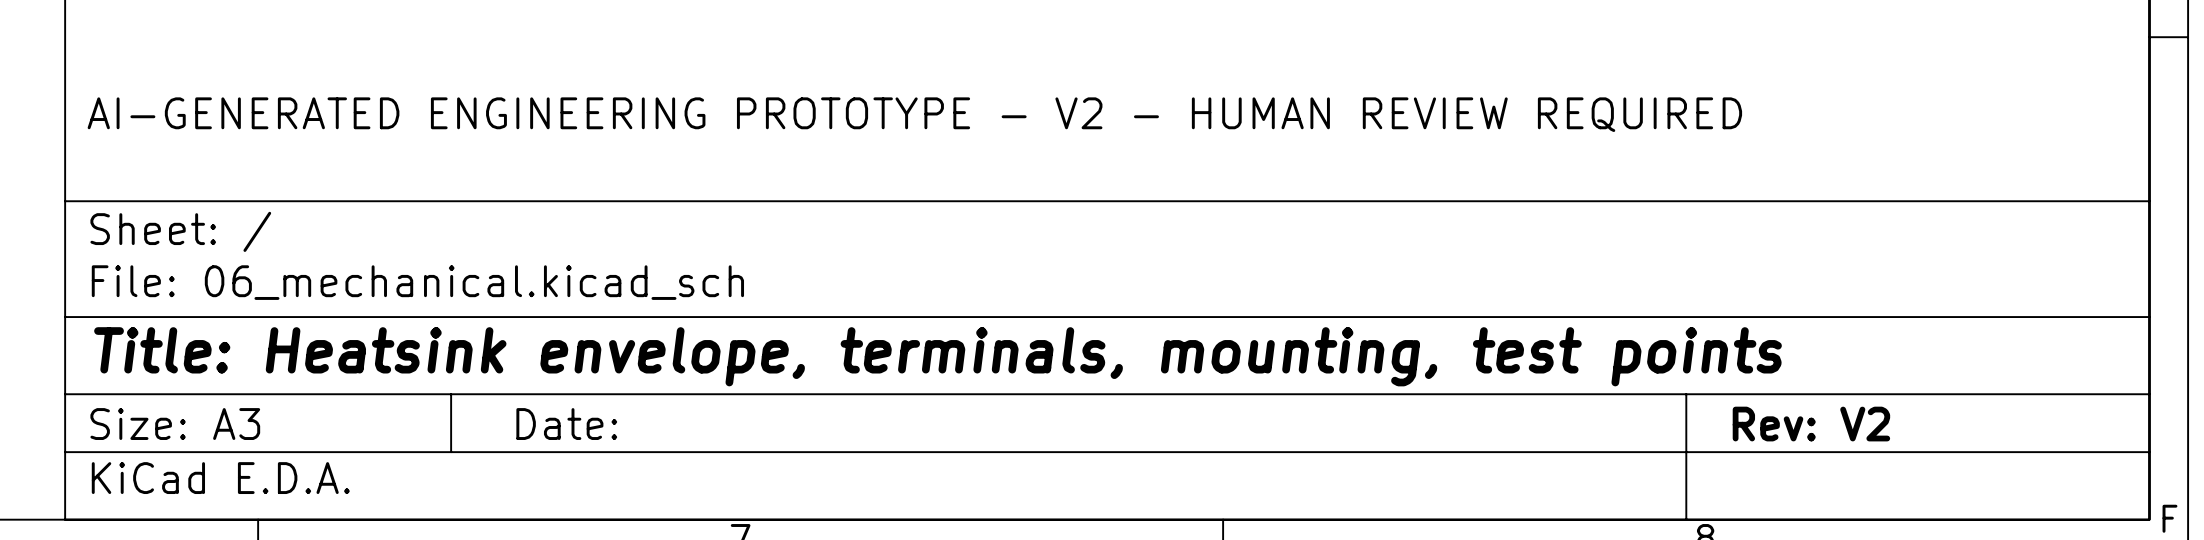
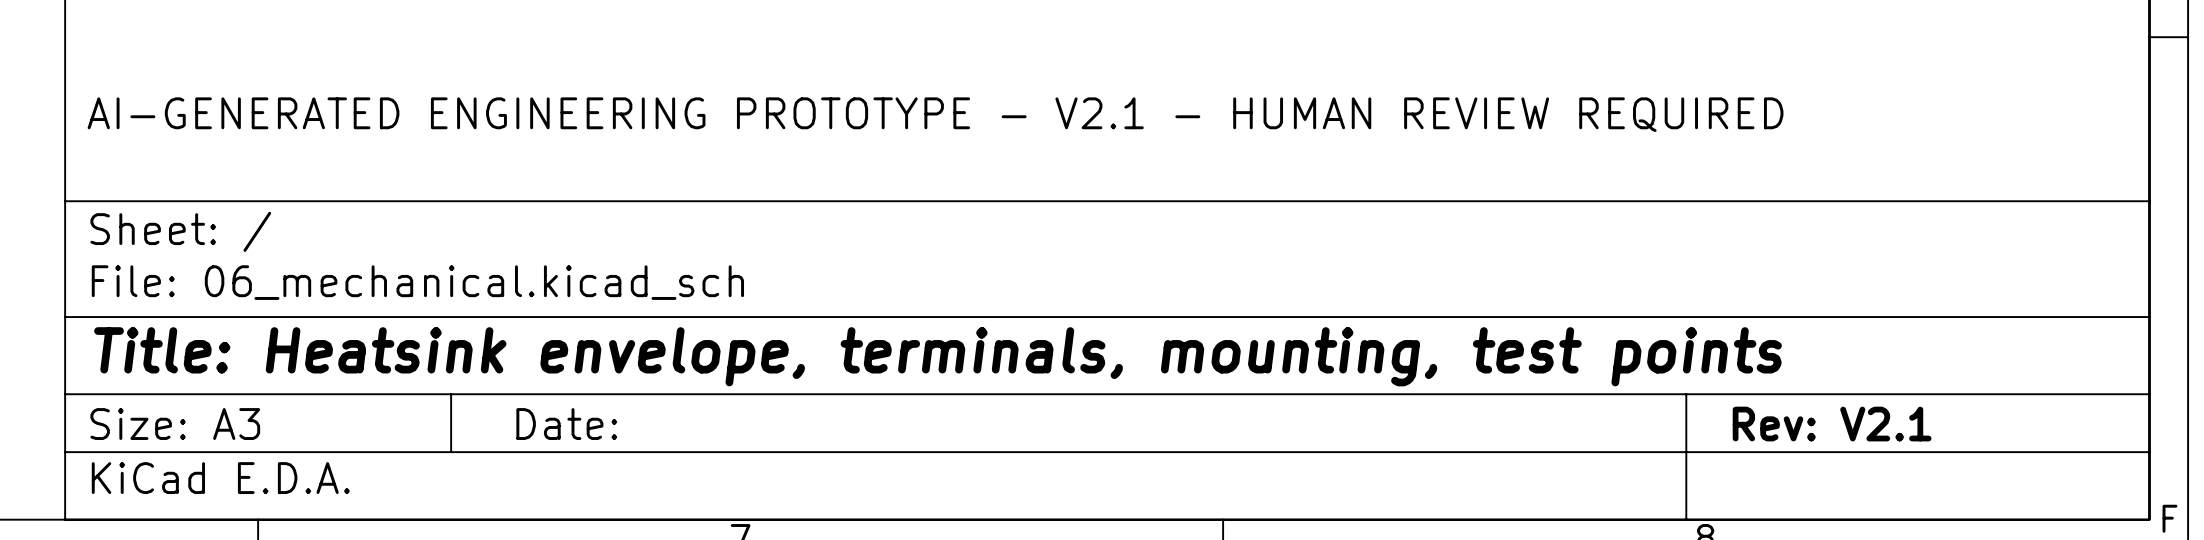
title block: AI-GENERATED ENGINEERING PROTOTYPE - V2 - HUMAN REVIEW REQUIRED (914, 114) -> AI-GENERATED ENGINEERING PROTOTYPE - V2.1 - HUMAN REVIEW REQUIRED (935, 114)
title block: Rev: V2 (1811, 424) -> Rev: V2.1 (1832, 424)

